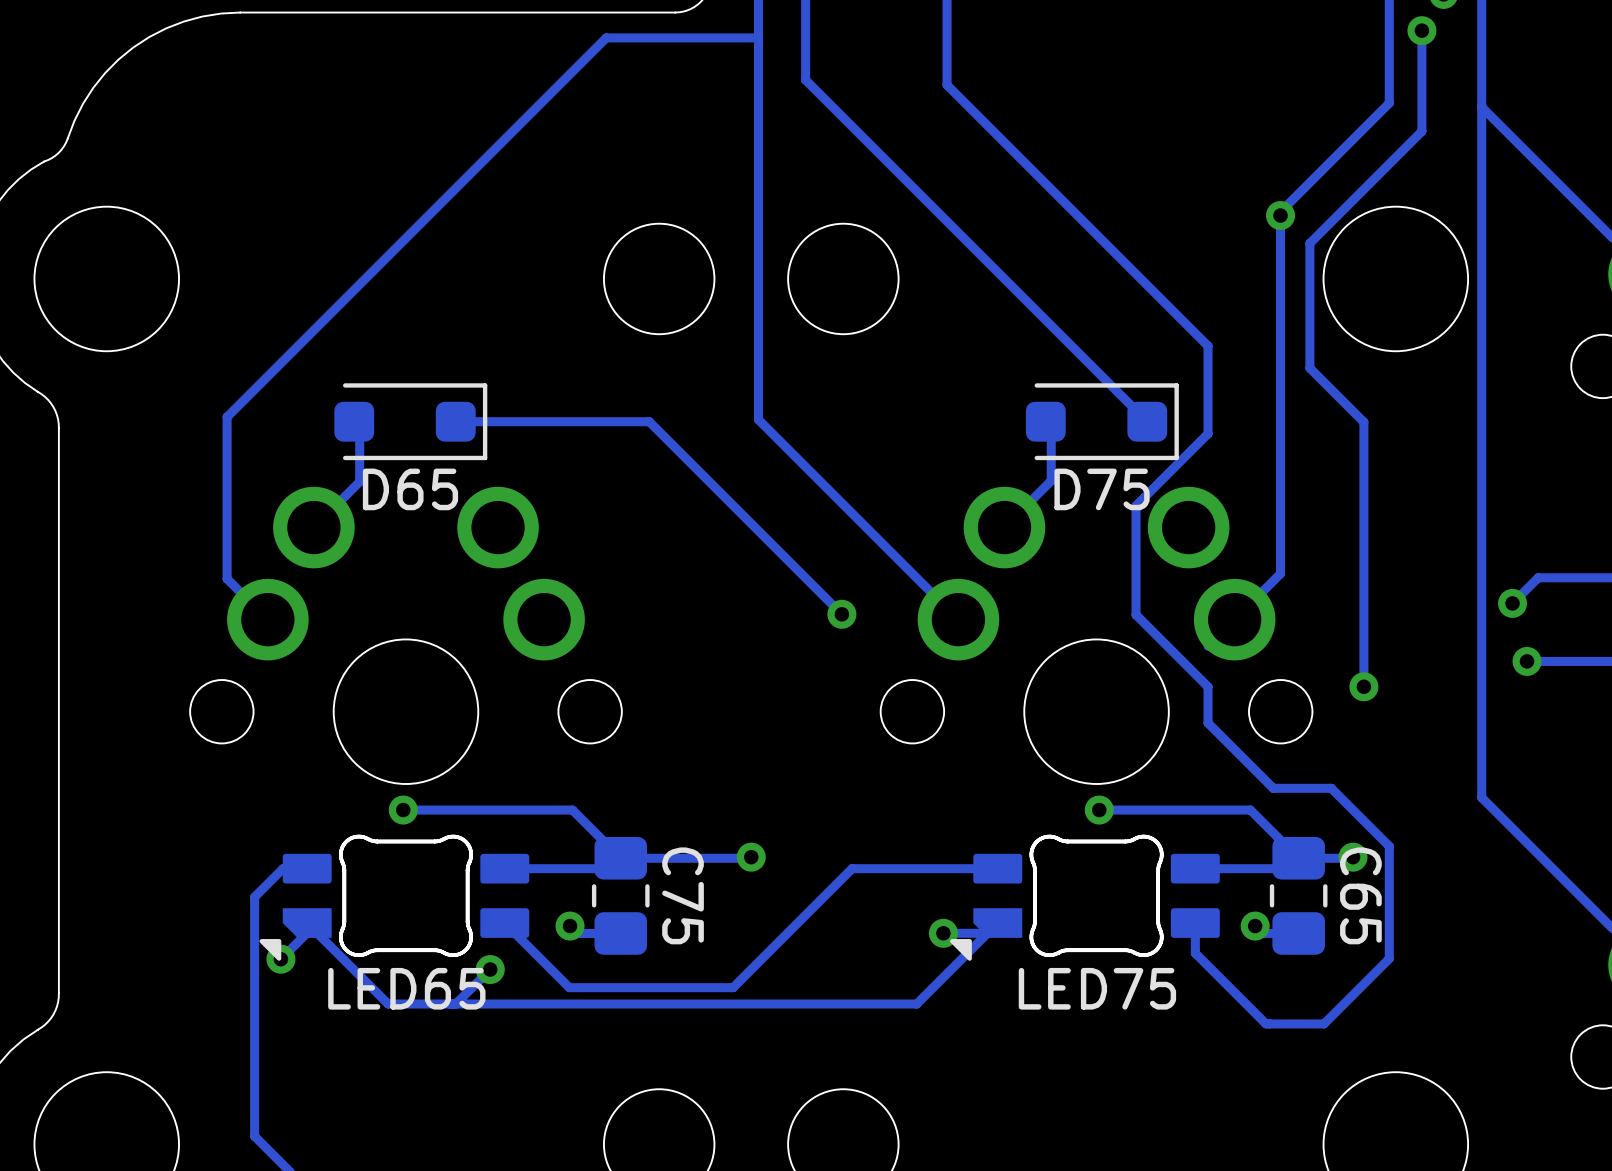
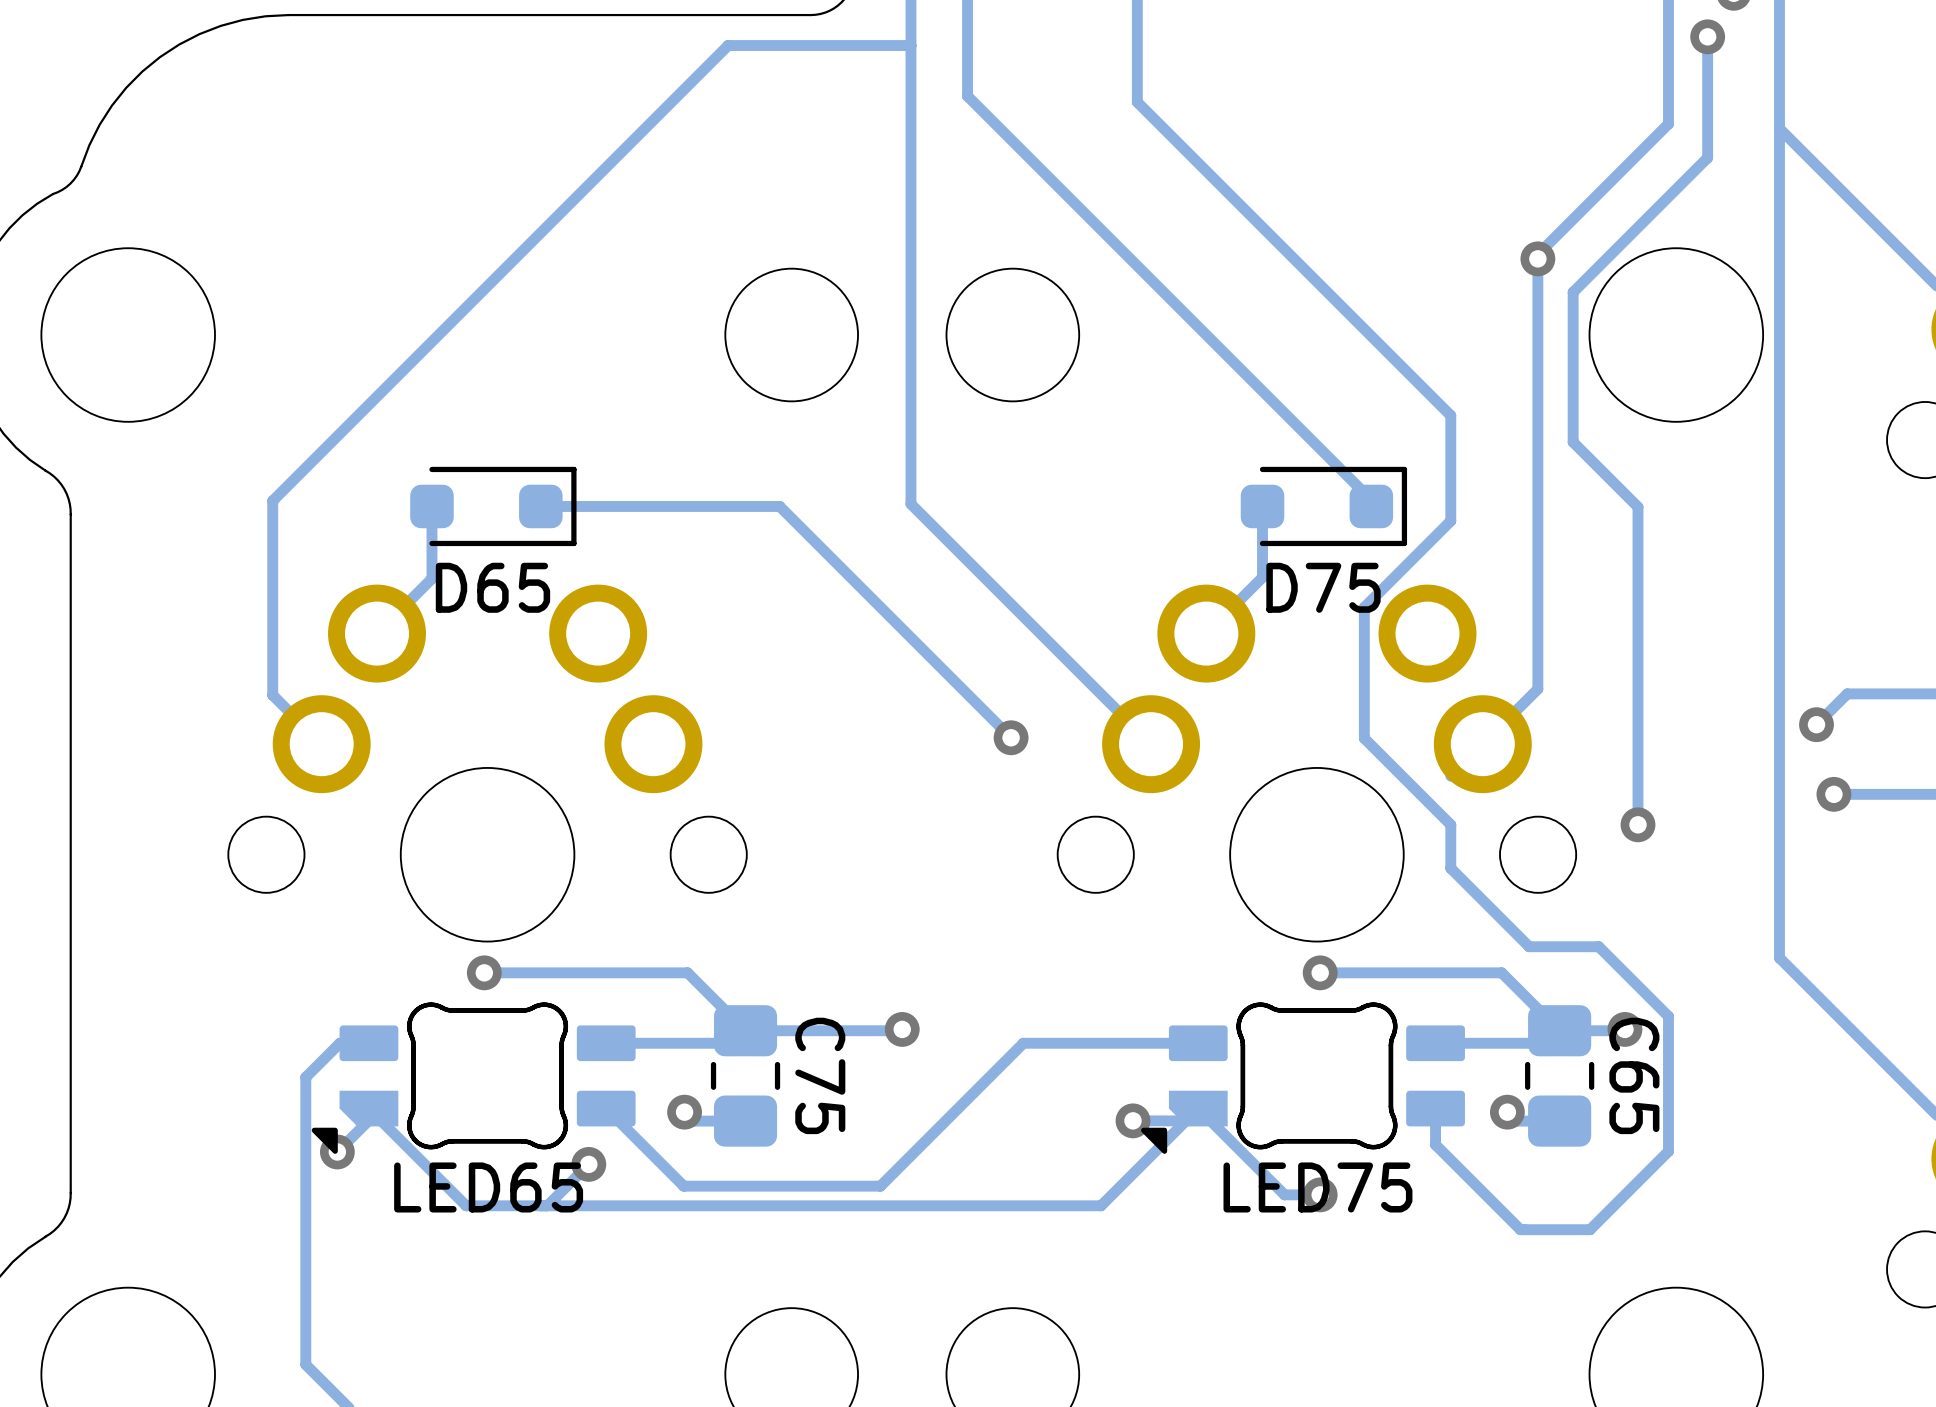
D65 footprint: [334, 383, 488, 461] -> [410, 466, 577, 547]
D75 footprint: [1025, 383, 1179, 461] -> [1240, 466, 1408, 547]
track: none -> (1198, 1108) (1284, 1194) (1328, 1194)
via: none -> (1320, 1194)

